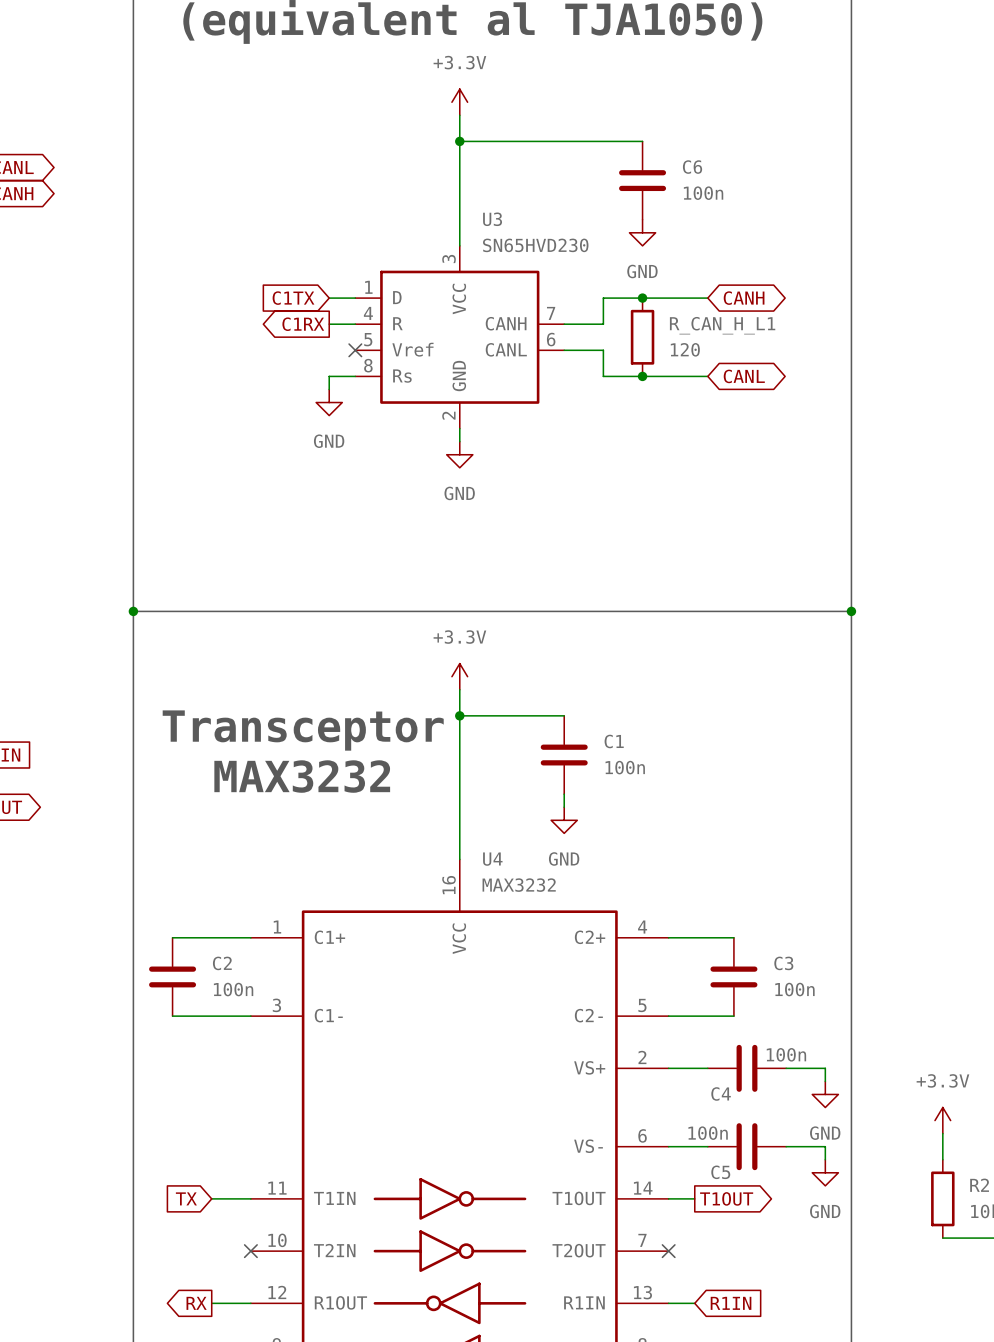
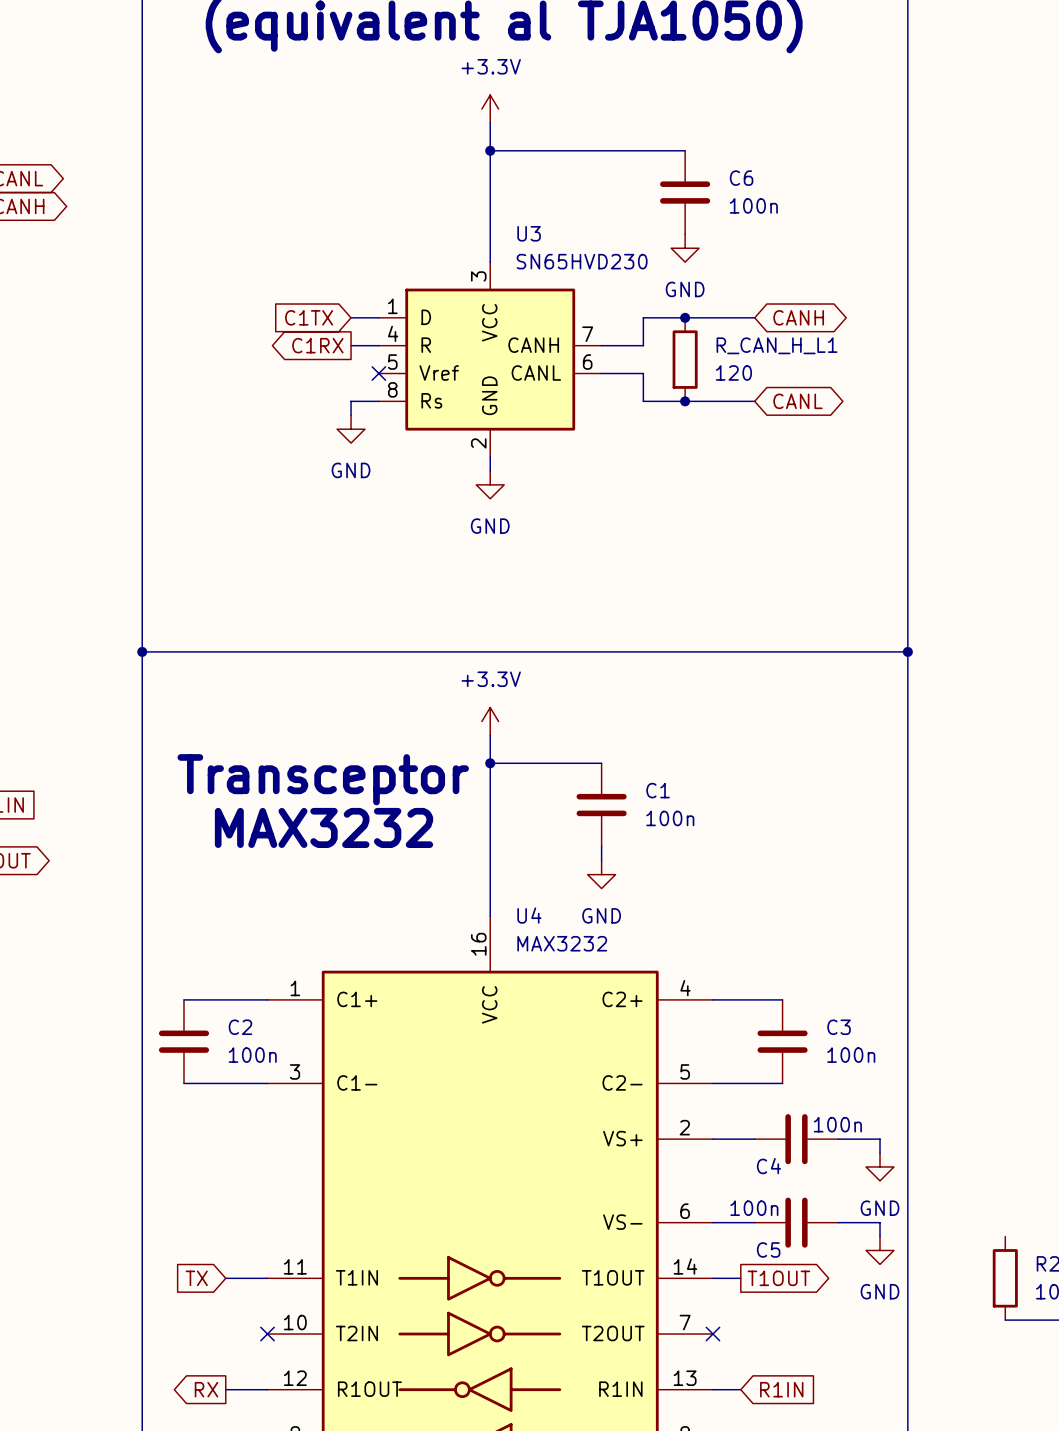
power symbol: +3.3V (942, 1120) -> none
wire: (942, 1133) (942, 1159) -> none

